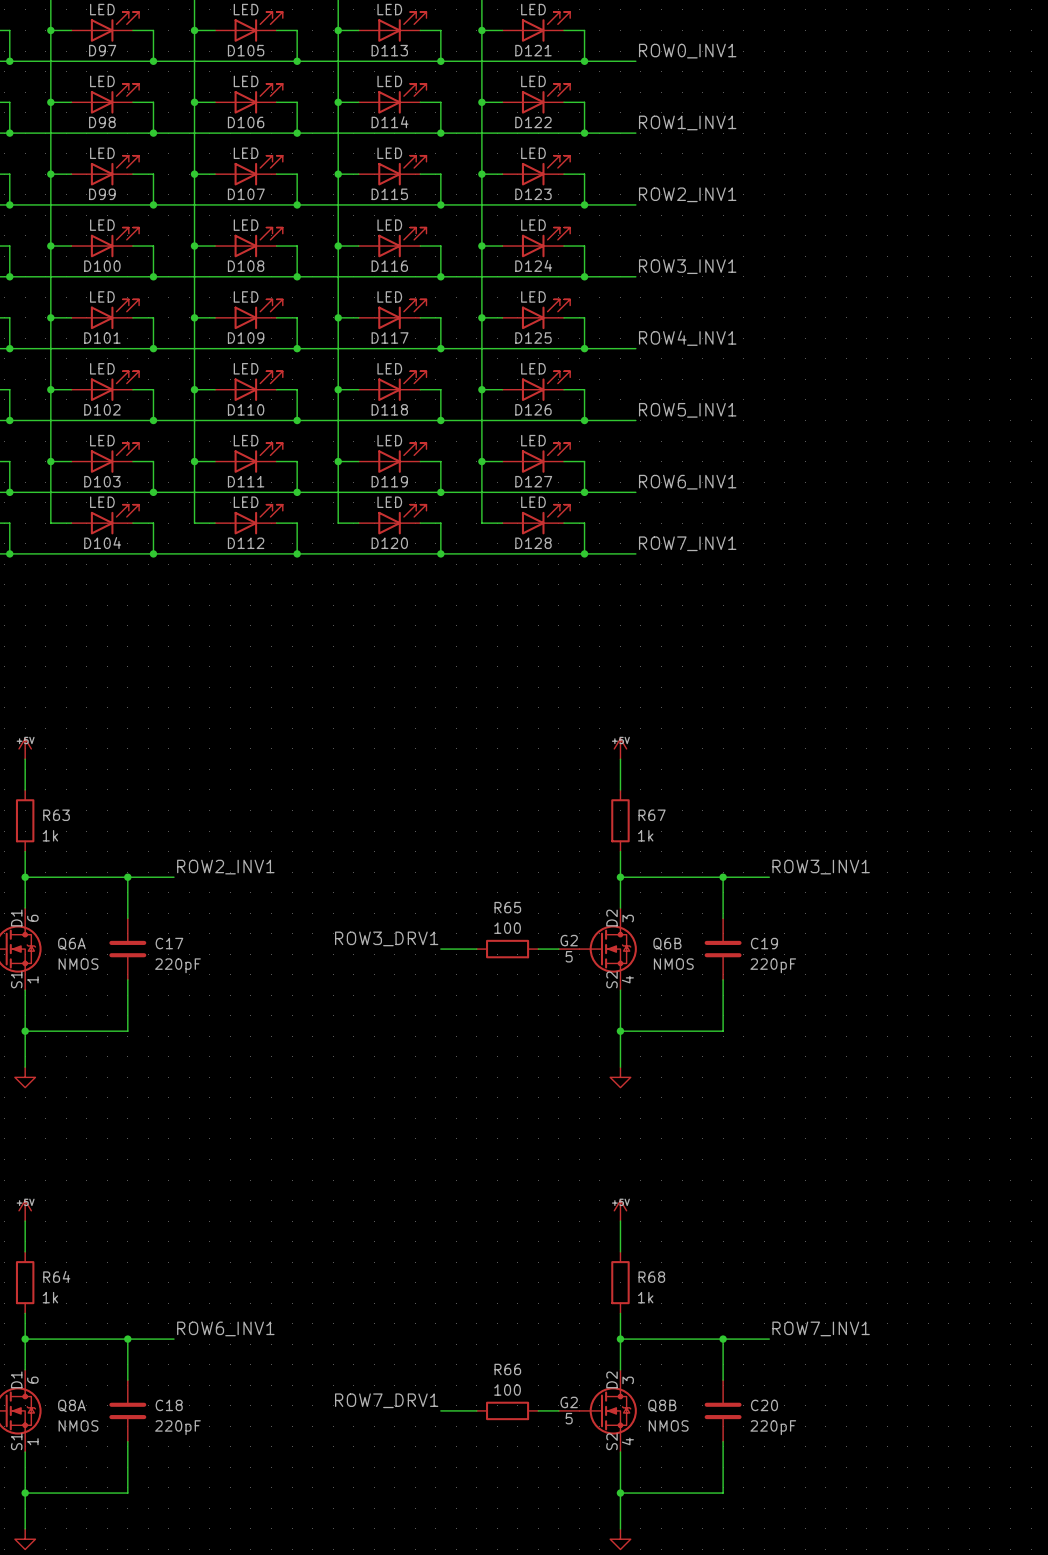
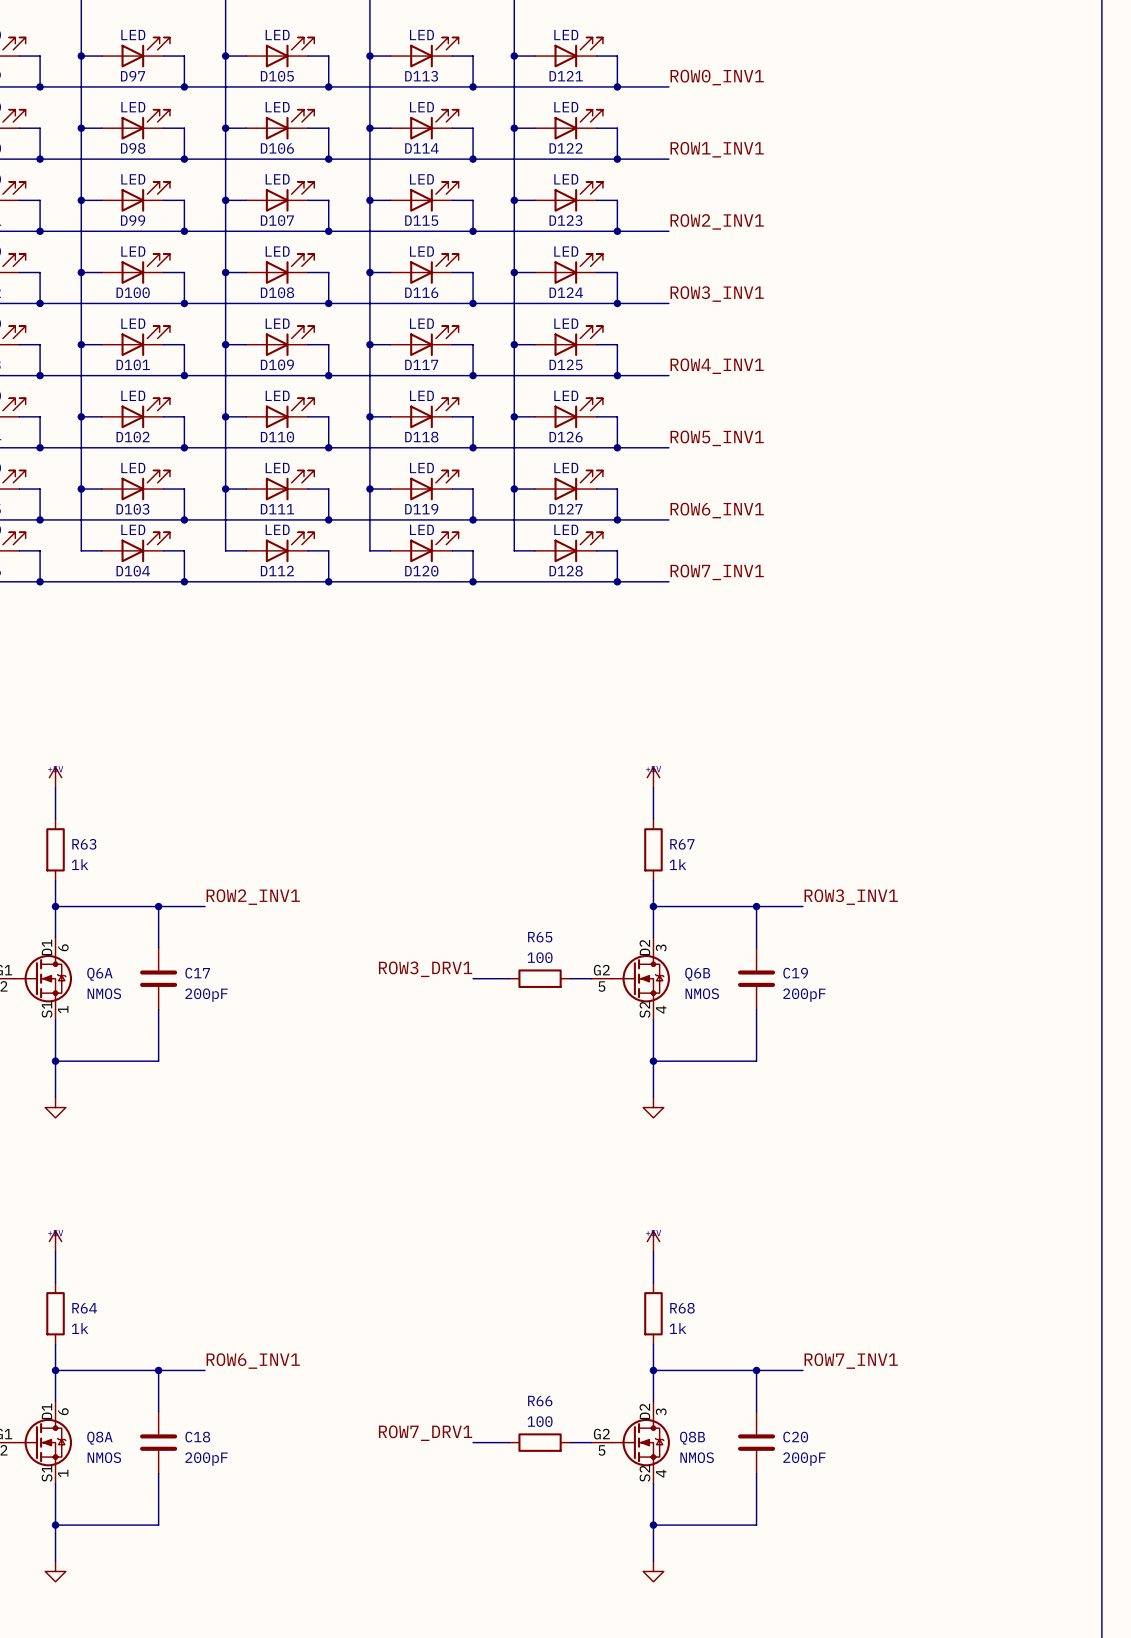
C17 value: 220pF (177, 965) -> 200pF (206, 995)
C19 value: 220pF (773, 965) -> 200pF (804, 995)
C18 value: 220pF (177, 1427) -> 200pF (206, 1459)
C20 value: 220pF (773, 1427) -> 200pF (804, 1459)

